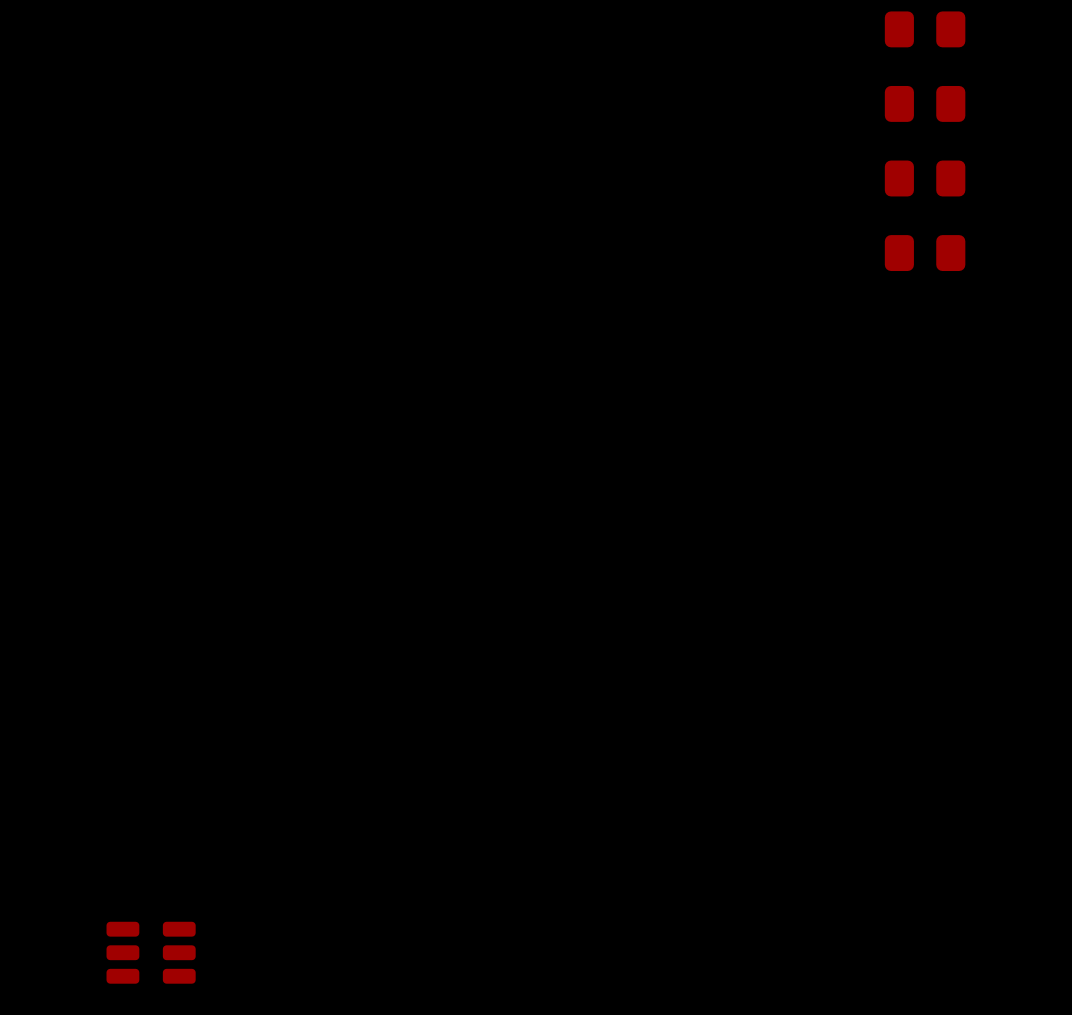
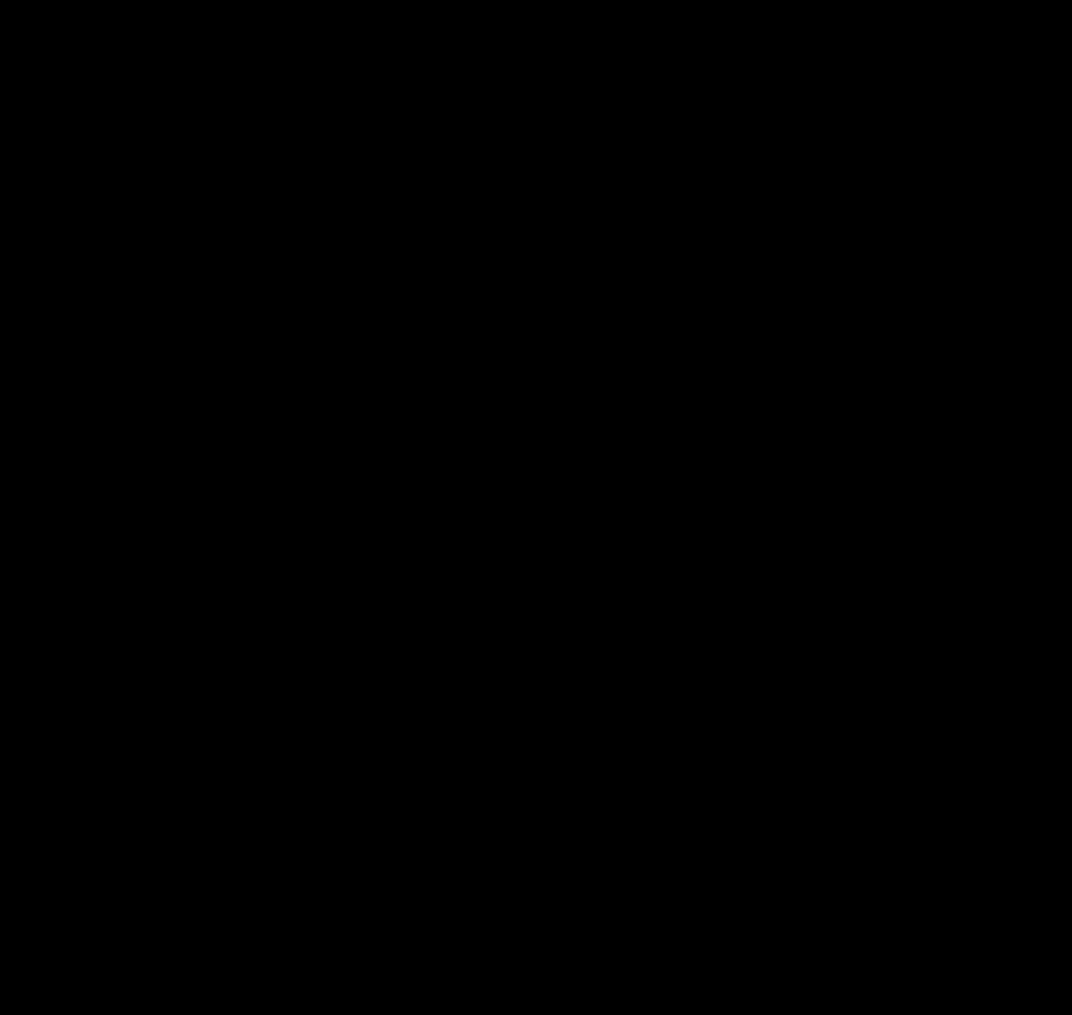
part: (925, 29) -> none
part: (925, 103) -> none
part: (925, 178) -> none
part: (925, 253) -> none
part: (151, 952) -> none

